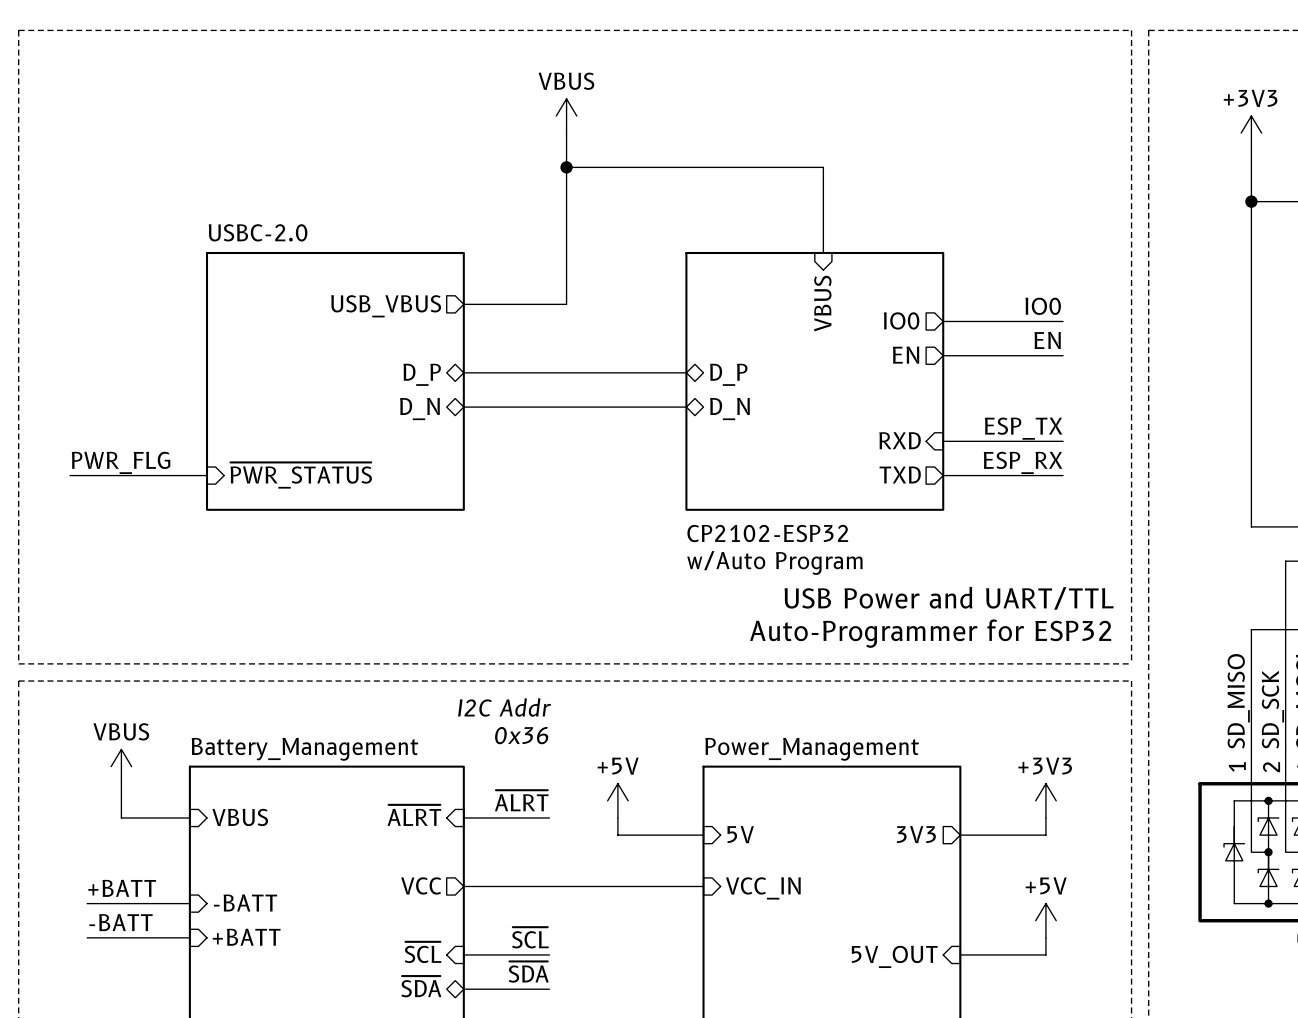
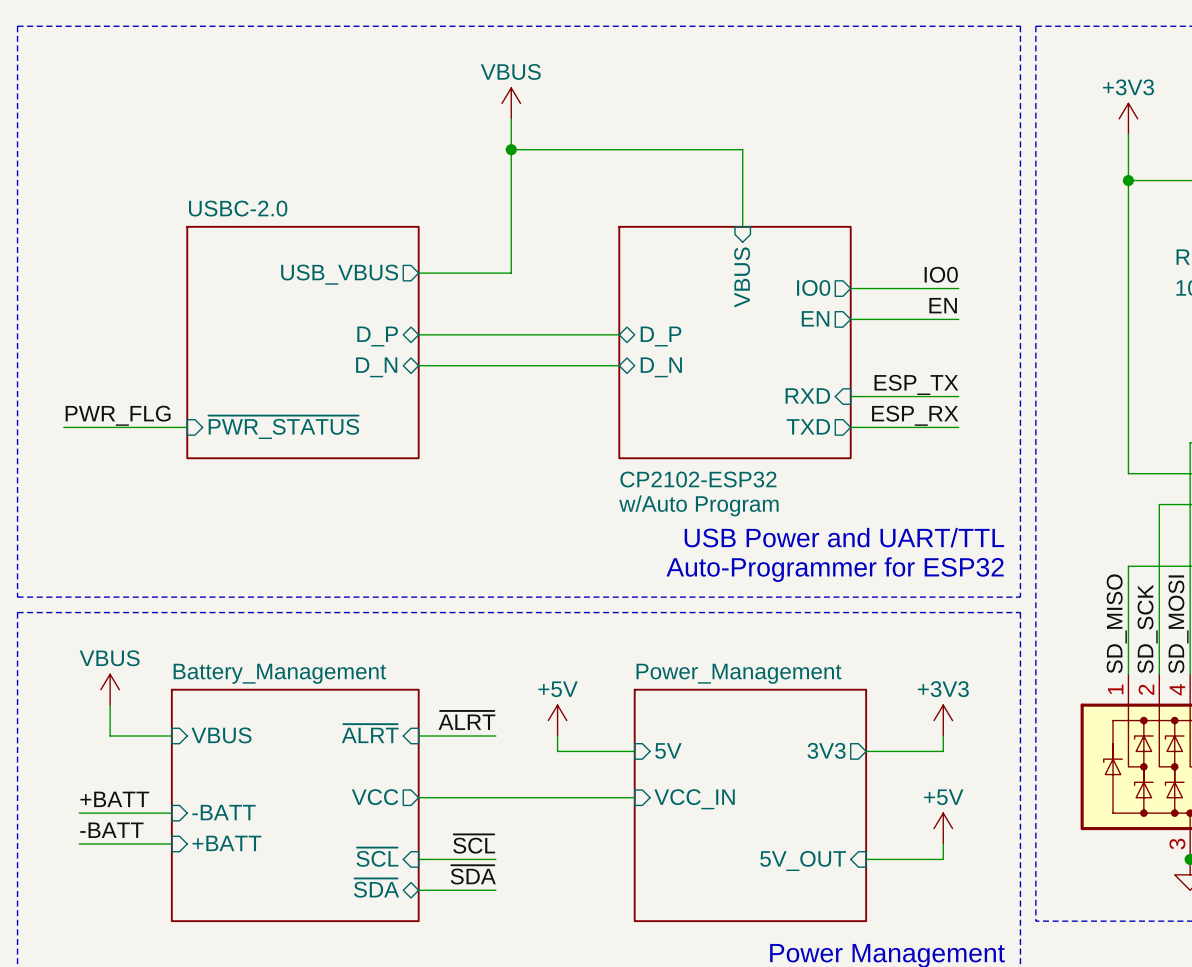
text: I2C Addr (504, 707) -> none
text: 0x36 (521, 735) -> none

